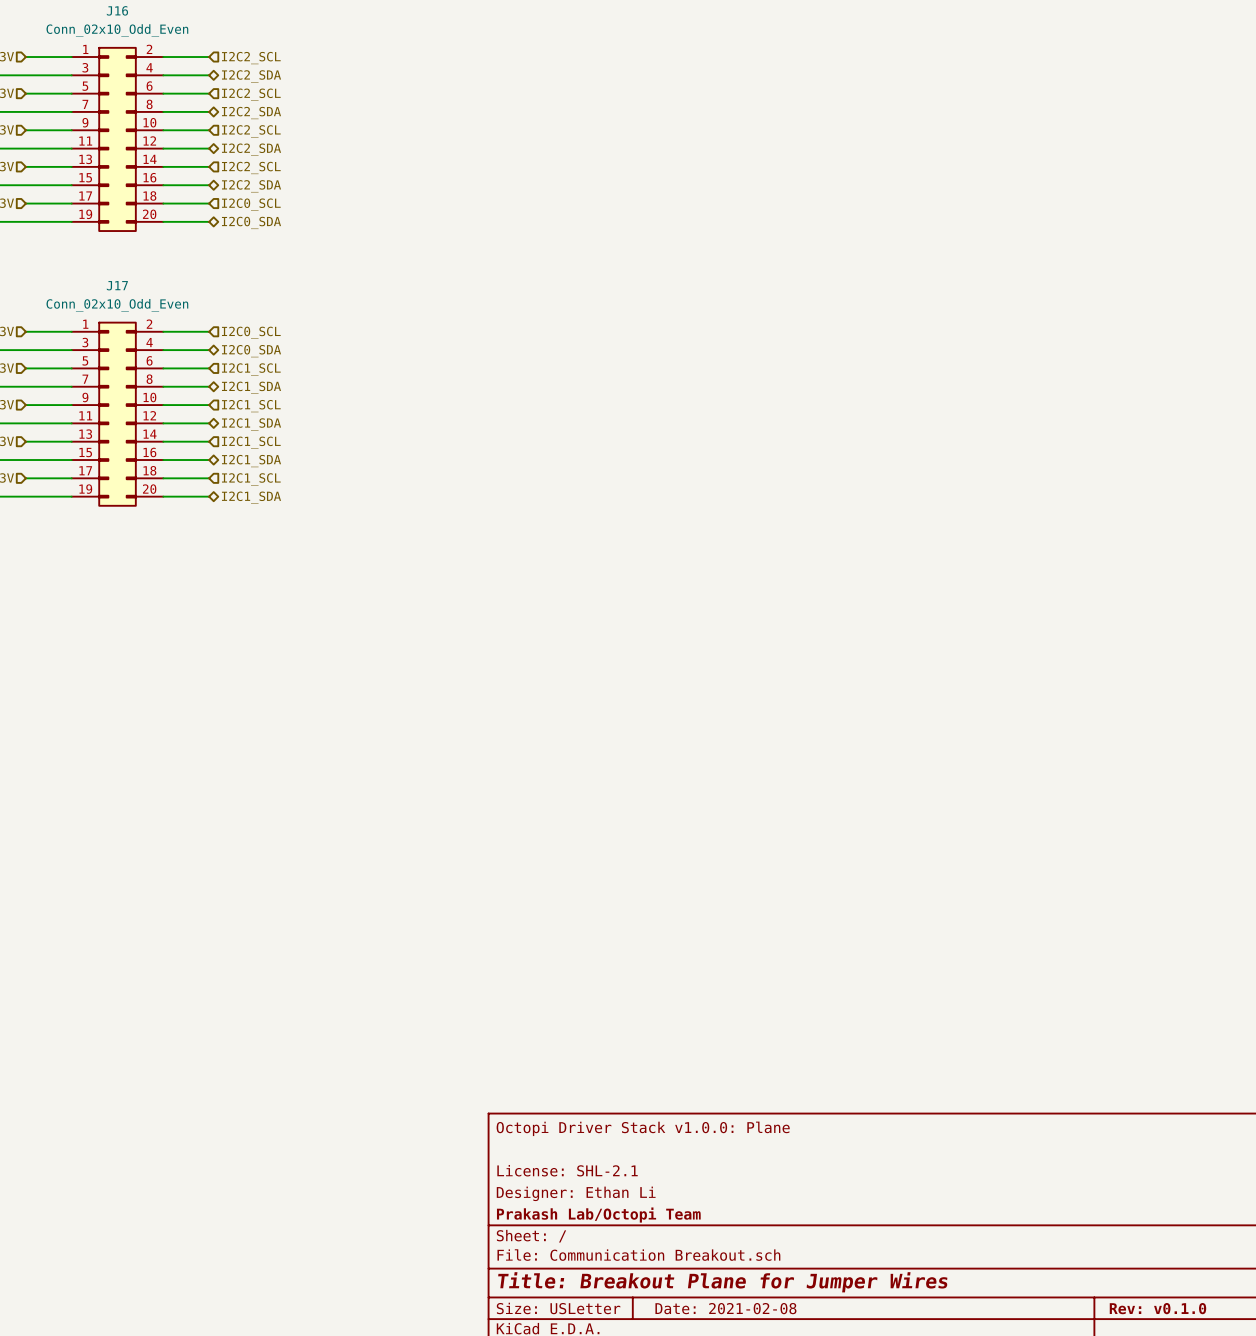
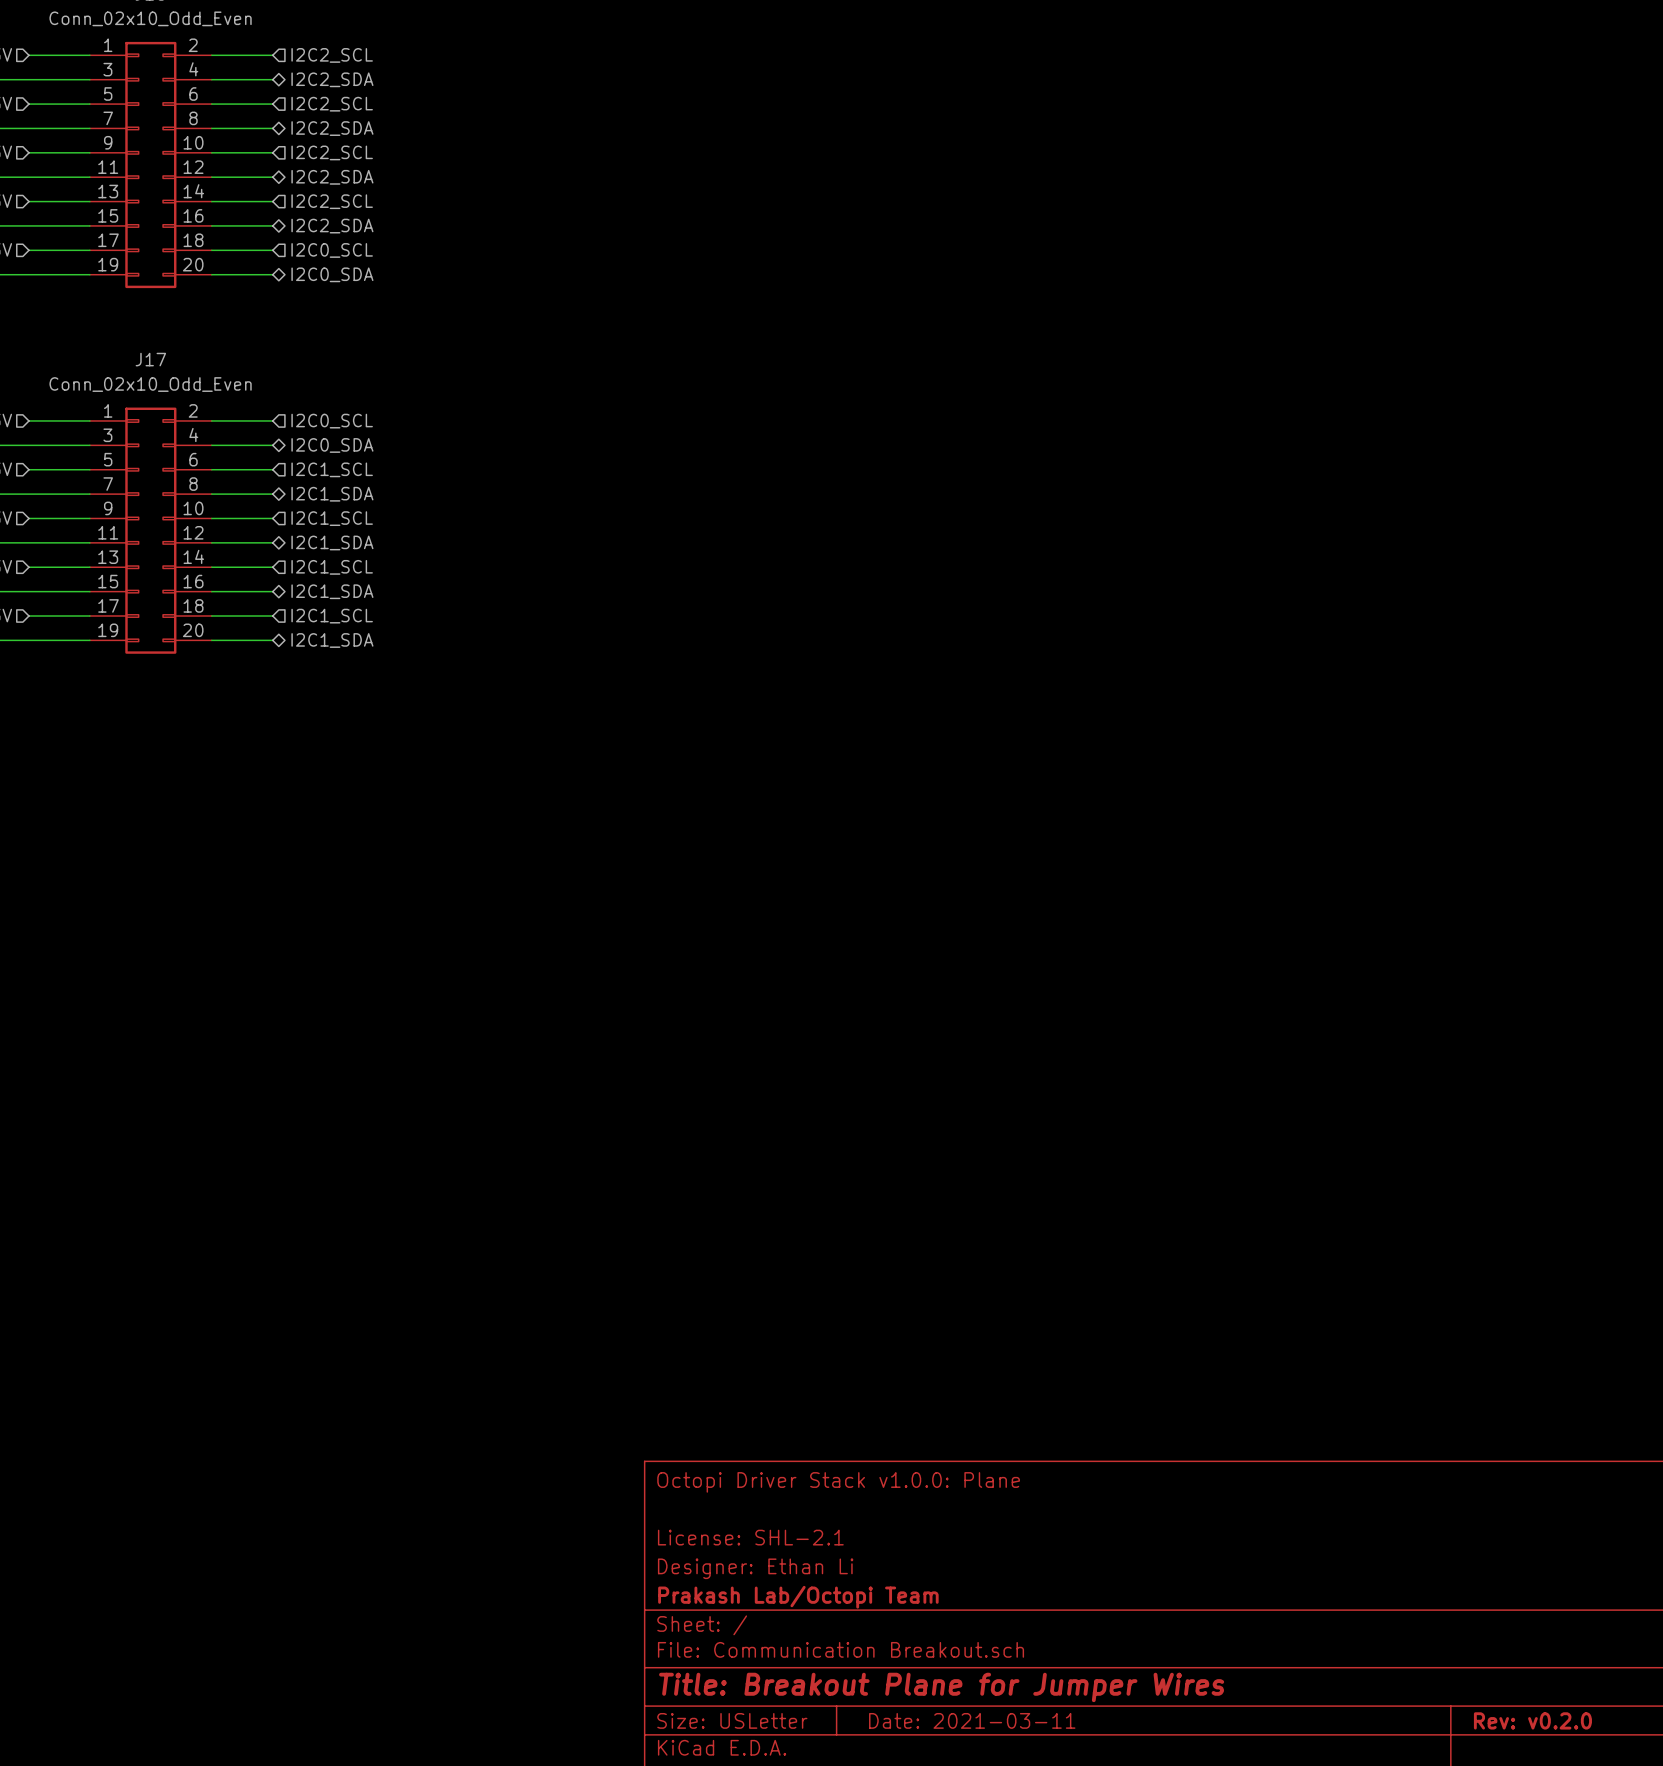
title block: Date: 2021-02-08 (725, 1308) -> Date: 2021-03-11 (972, 1720)
title block: Rev: v0.1.0 (1157, 1308) -> Rev: v0.2.0 (1532, 1720)

